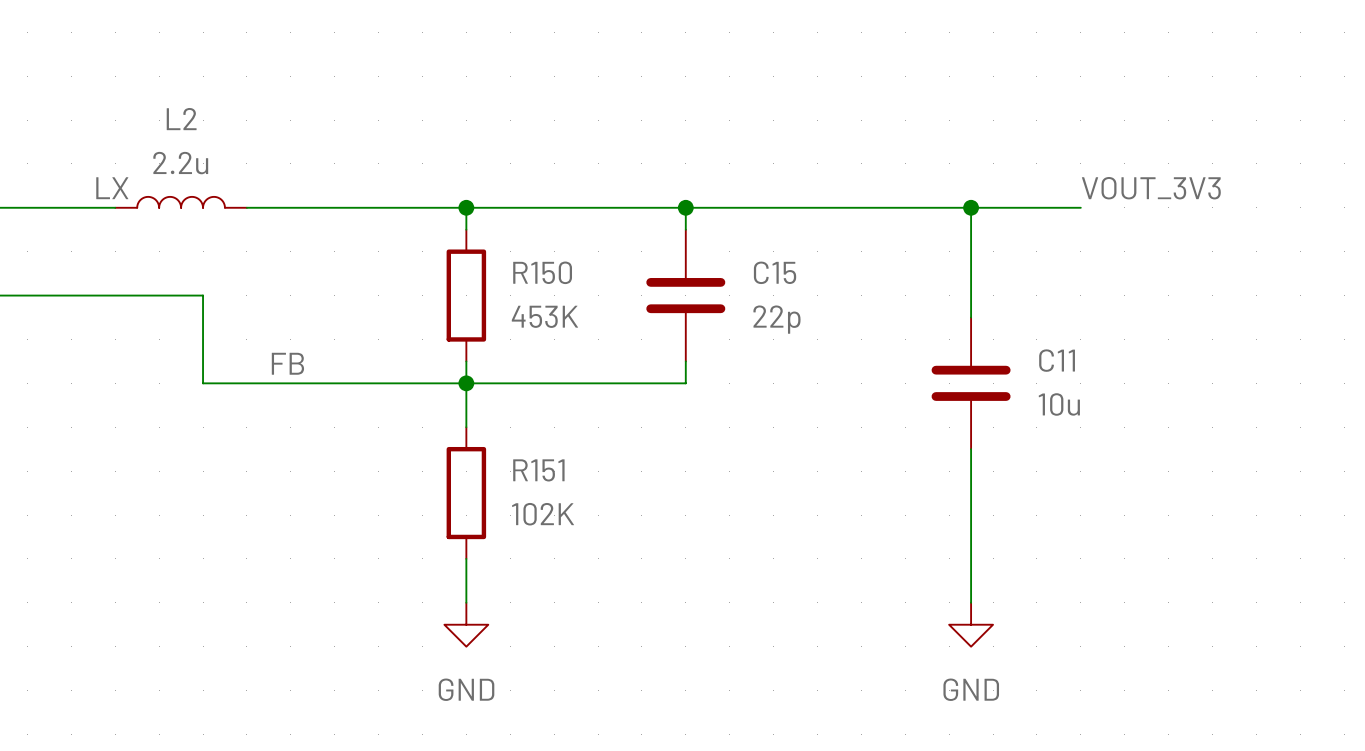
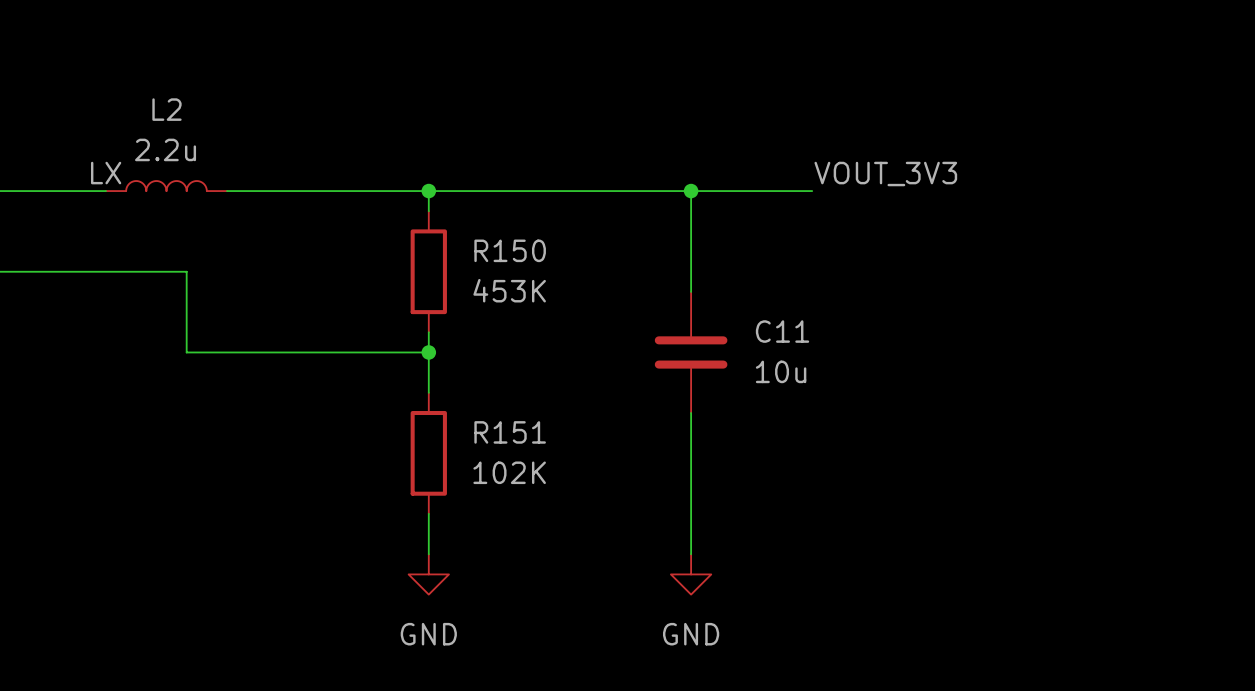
label position: VOUT_3V3 (1151, 188) -> VOUT_3V3 (885, 174)
wire: (685, 207) (685, 229) -> none
junction position: (685, 207) -> (691, 191)
wire: (883, 207) (1080, 207) -> none
wire: (971, 207) (971, 317) -> (691, 191) (691, 291)
junction: (971, 207) -> none
C15: 22p (685, 295) -> none
wire: (685, 361) (685, 383) (466, 383) -> none
label: FB (287, 363) -> none
C11 position: (971, 383) -> (691, 352)
wire: (971, 449) (971, 602) -> (691, 413) (691, 554)
power symbol position: GND (971, 624) -> GND (691, 574)

